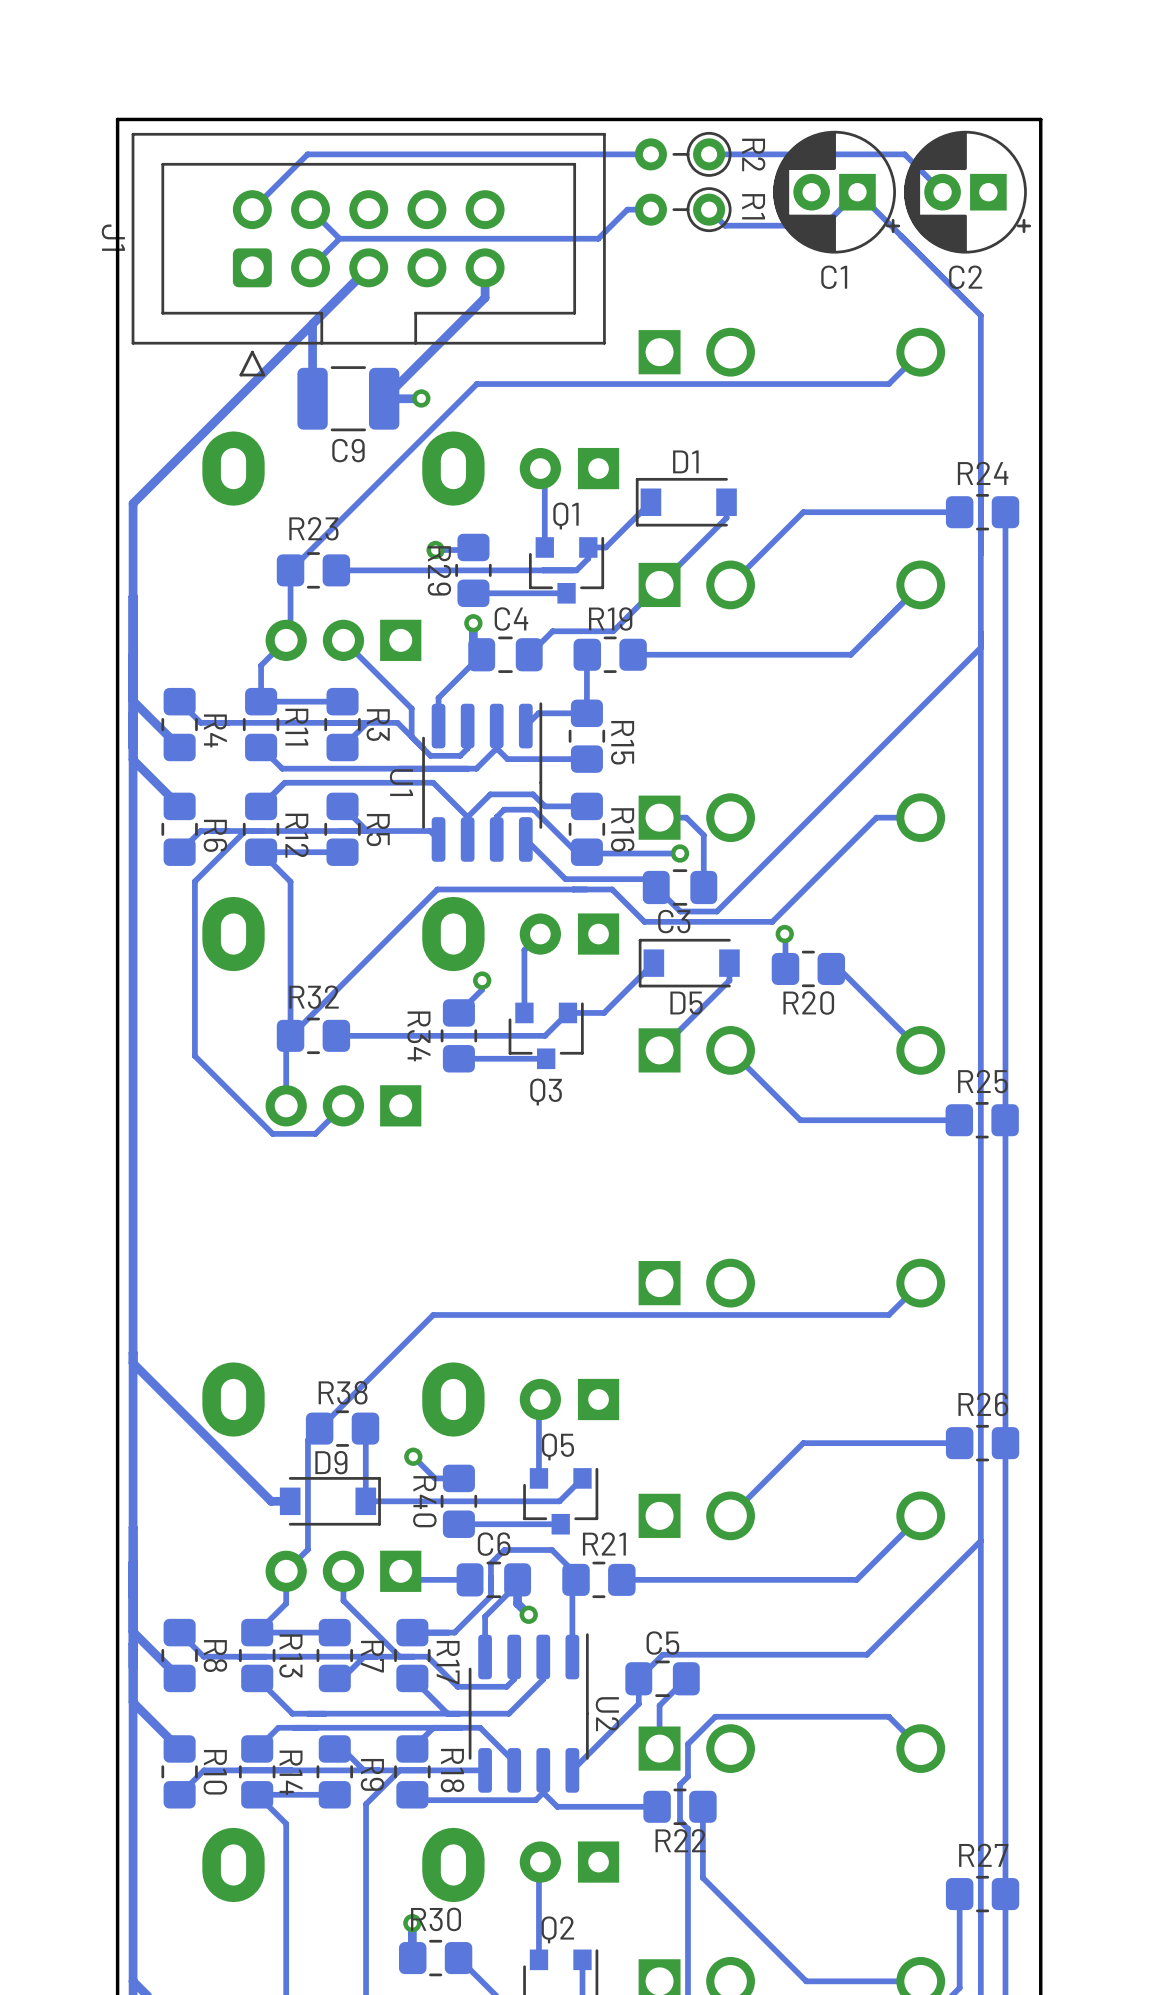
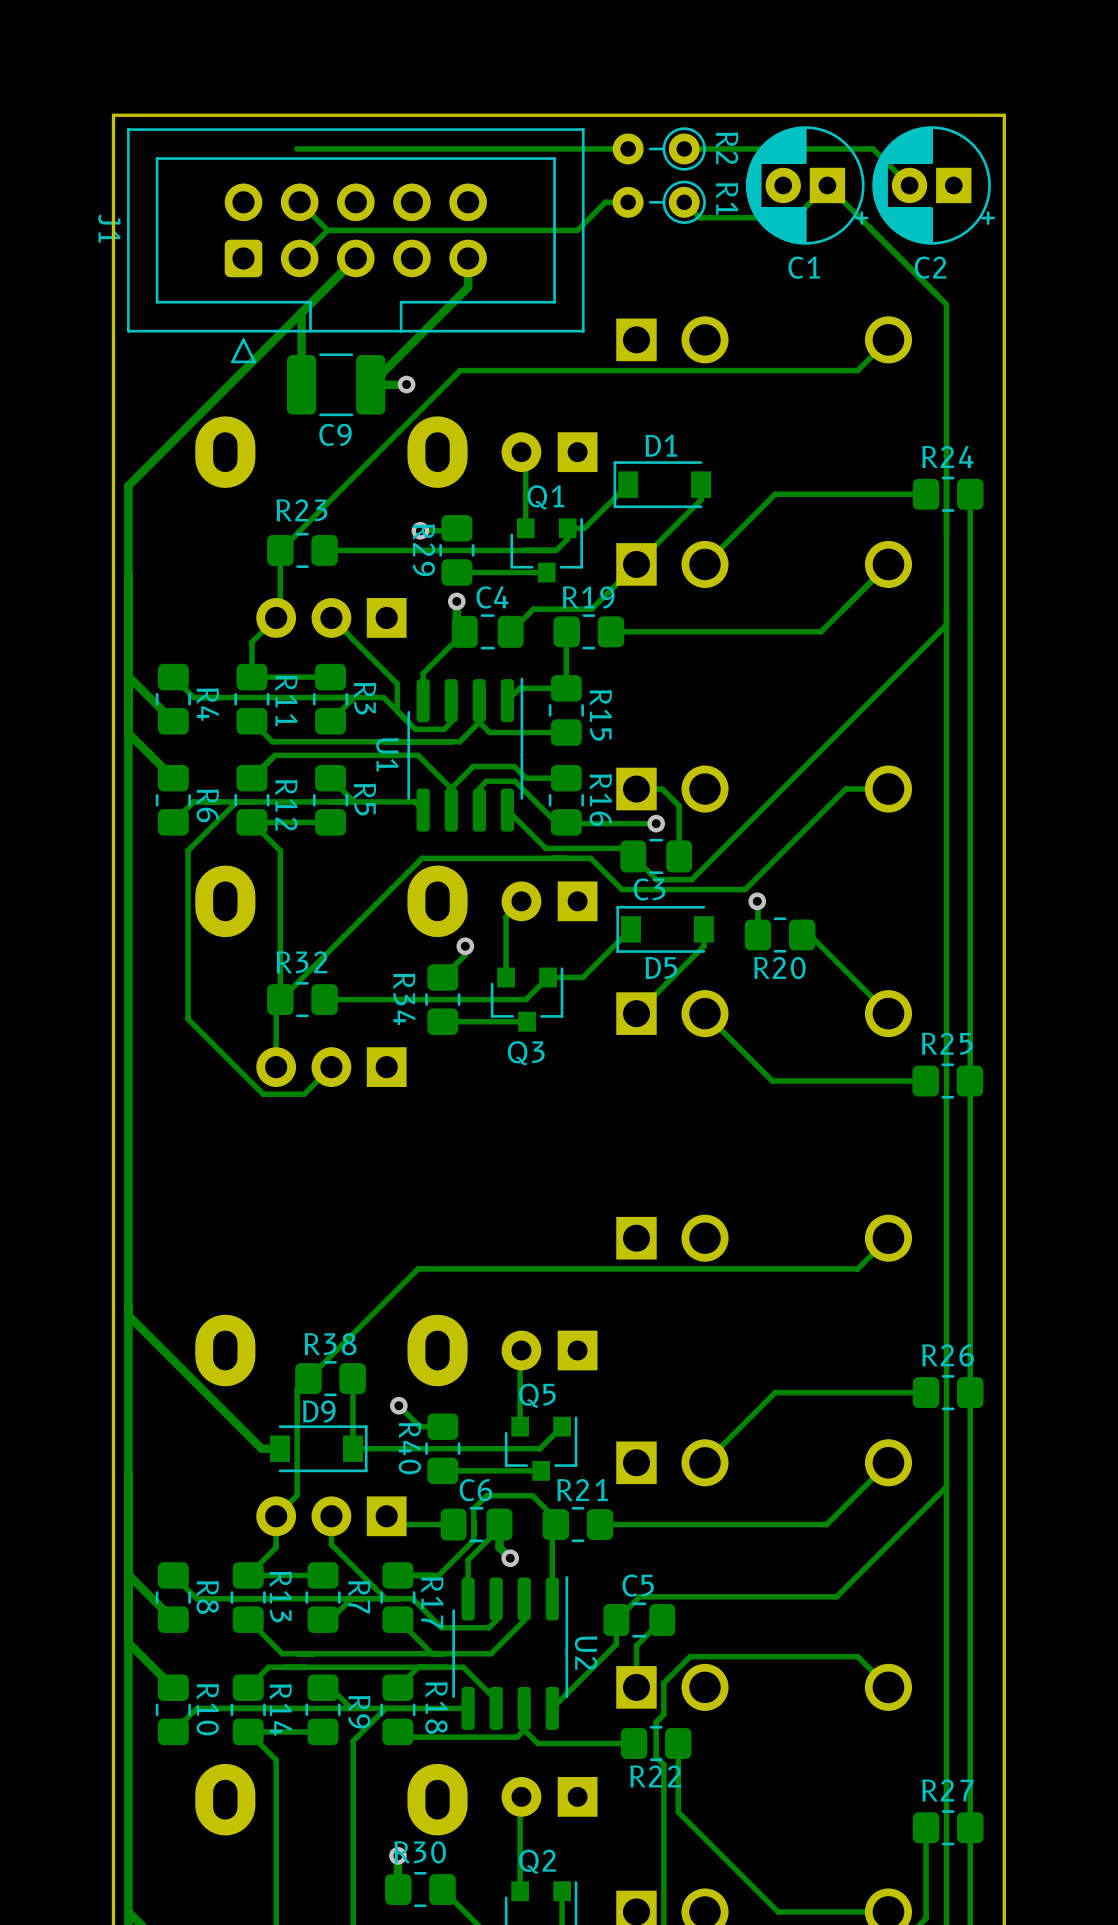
track: (307, 154) (252, 209) -> none

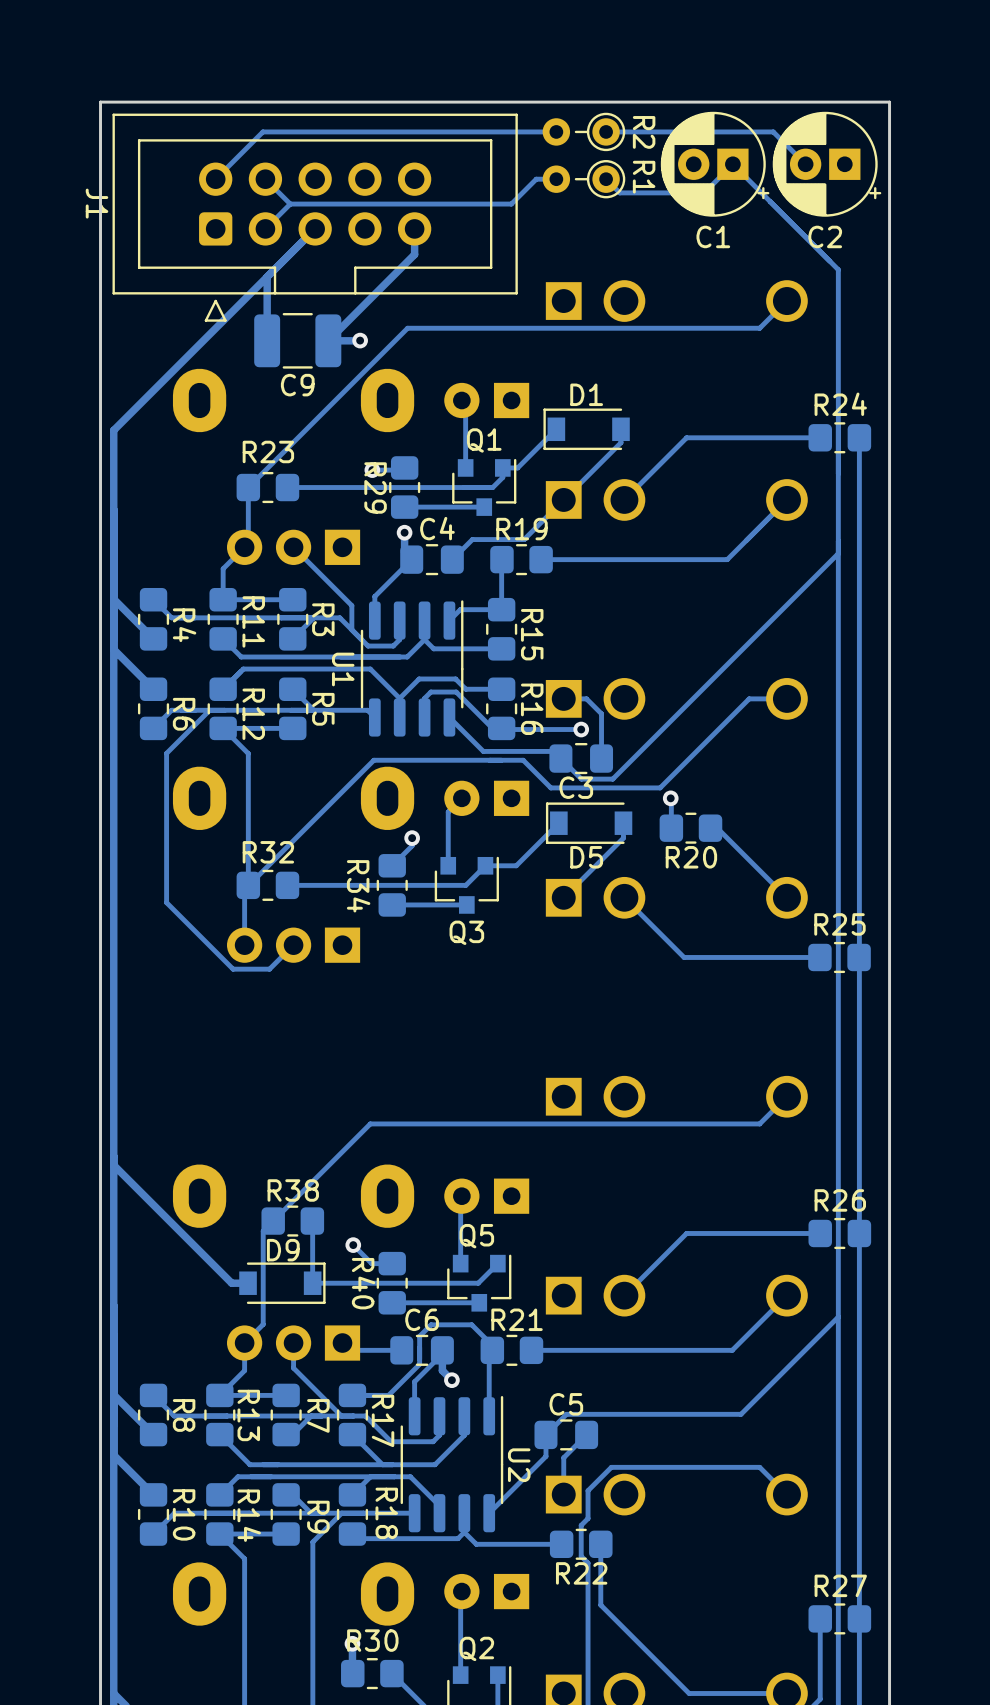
track: none -> (262, 131) (215, 179)

